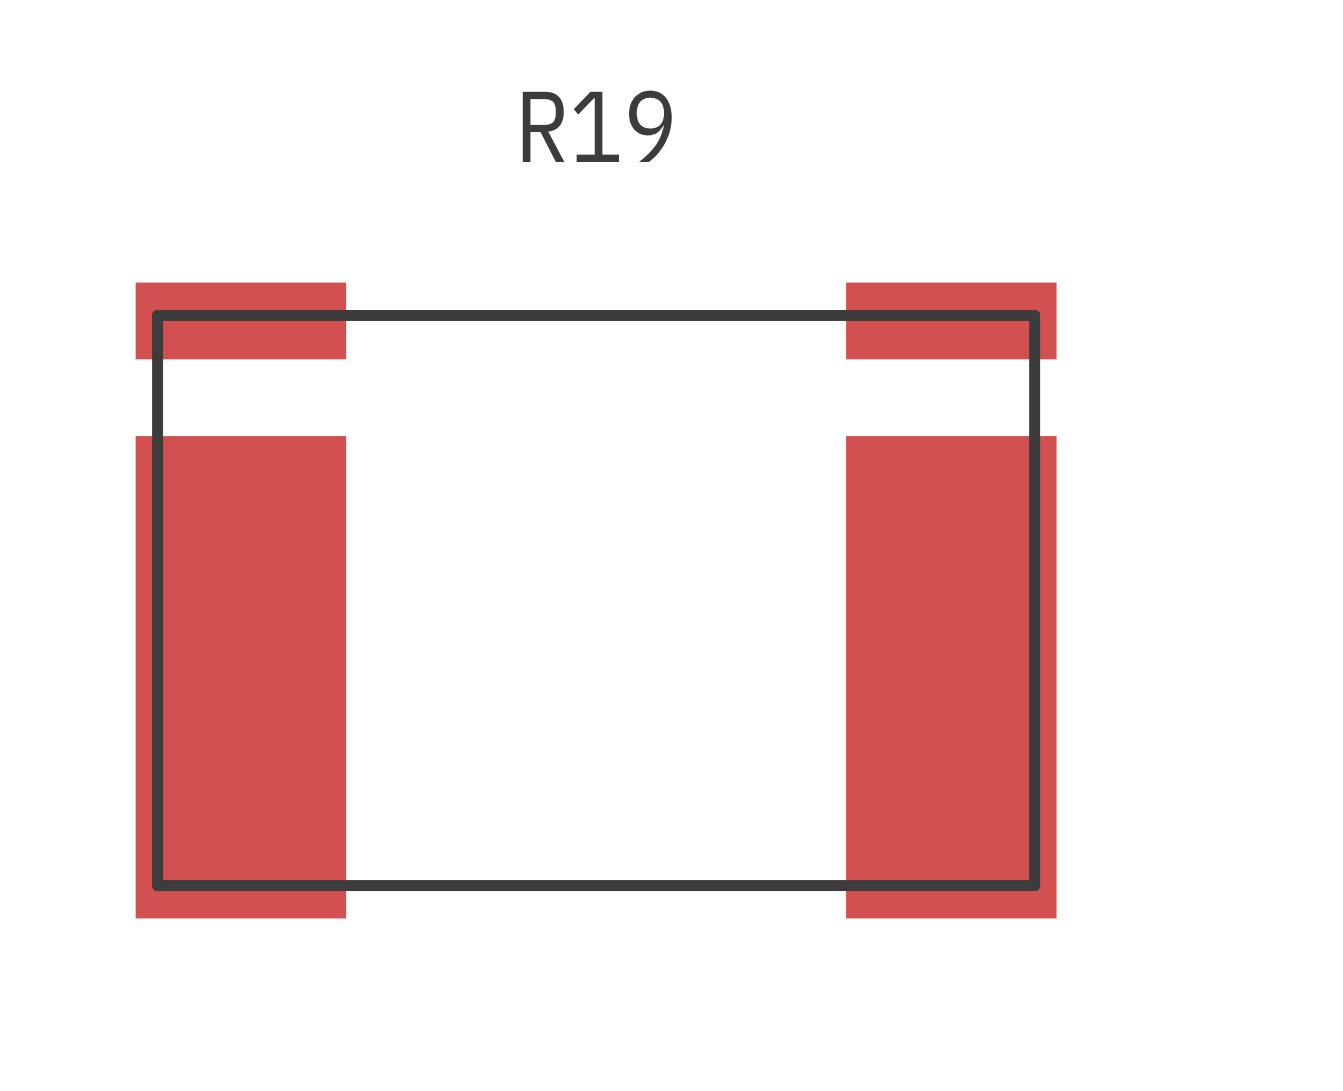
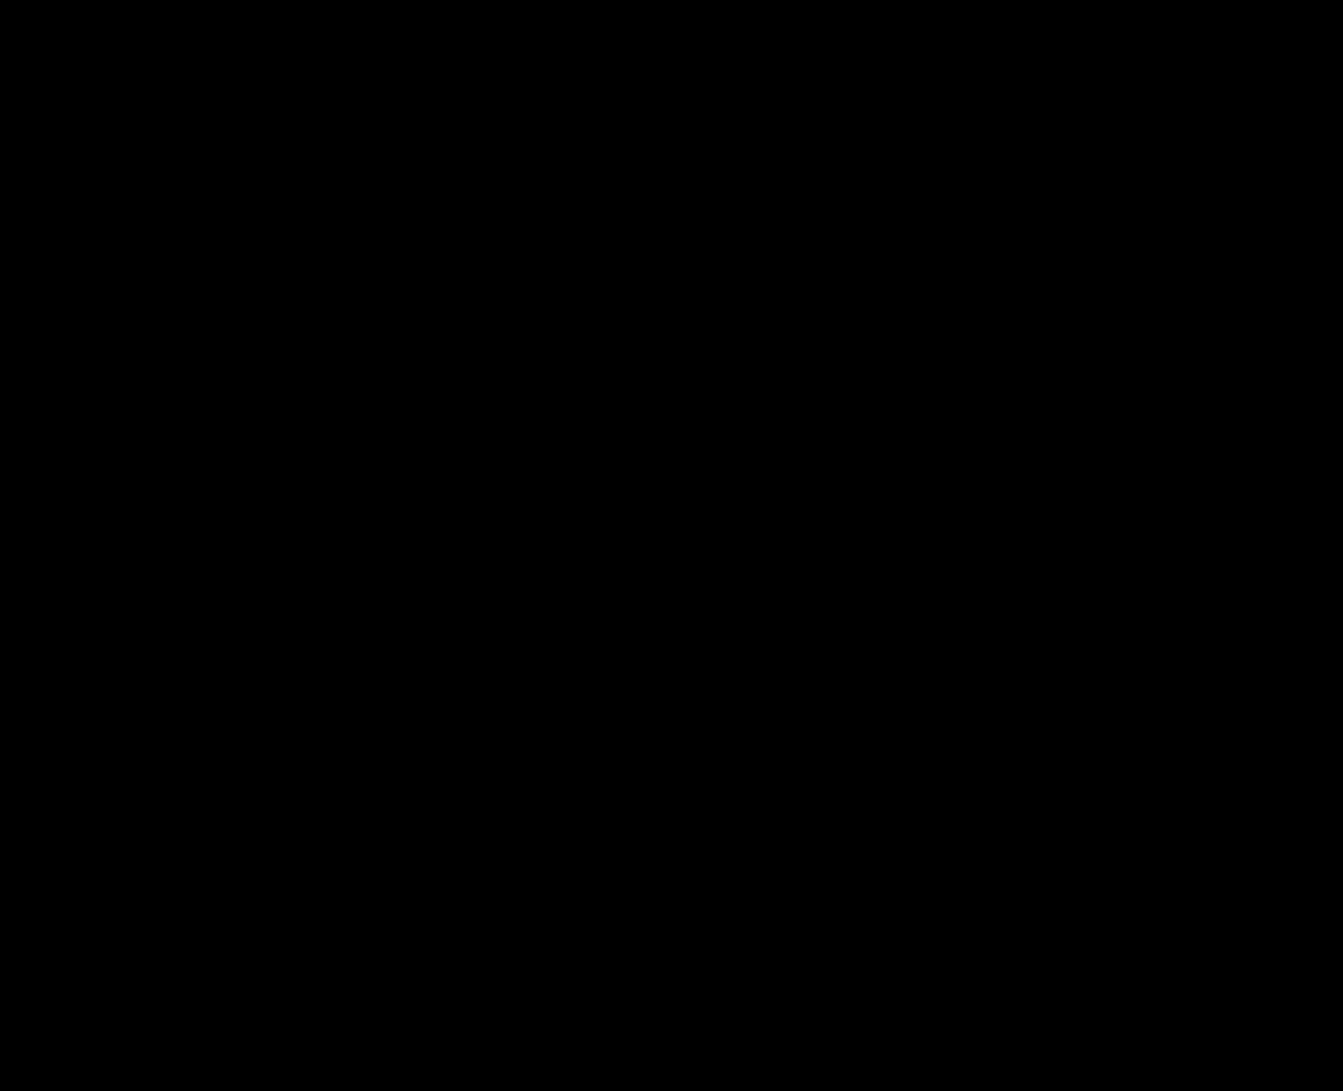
R19: (596, 600) -> none

